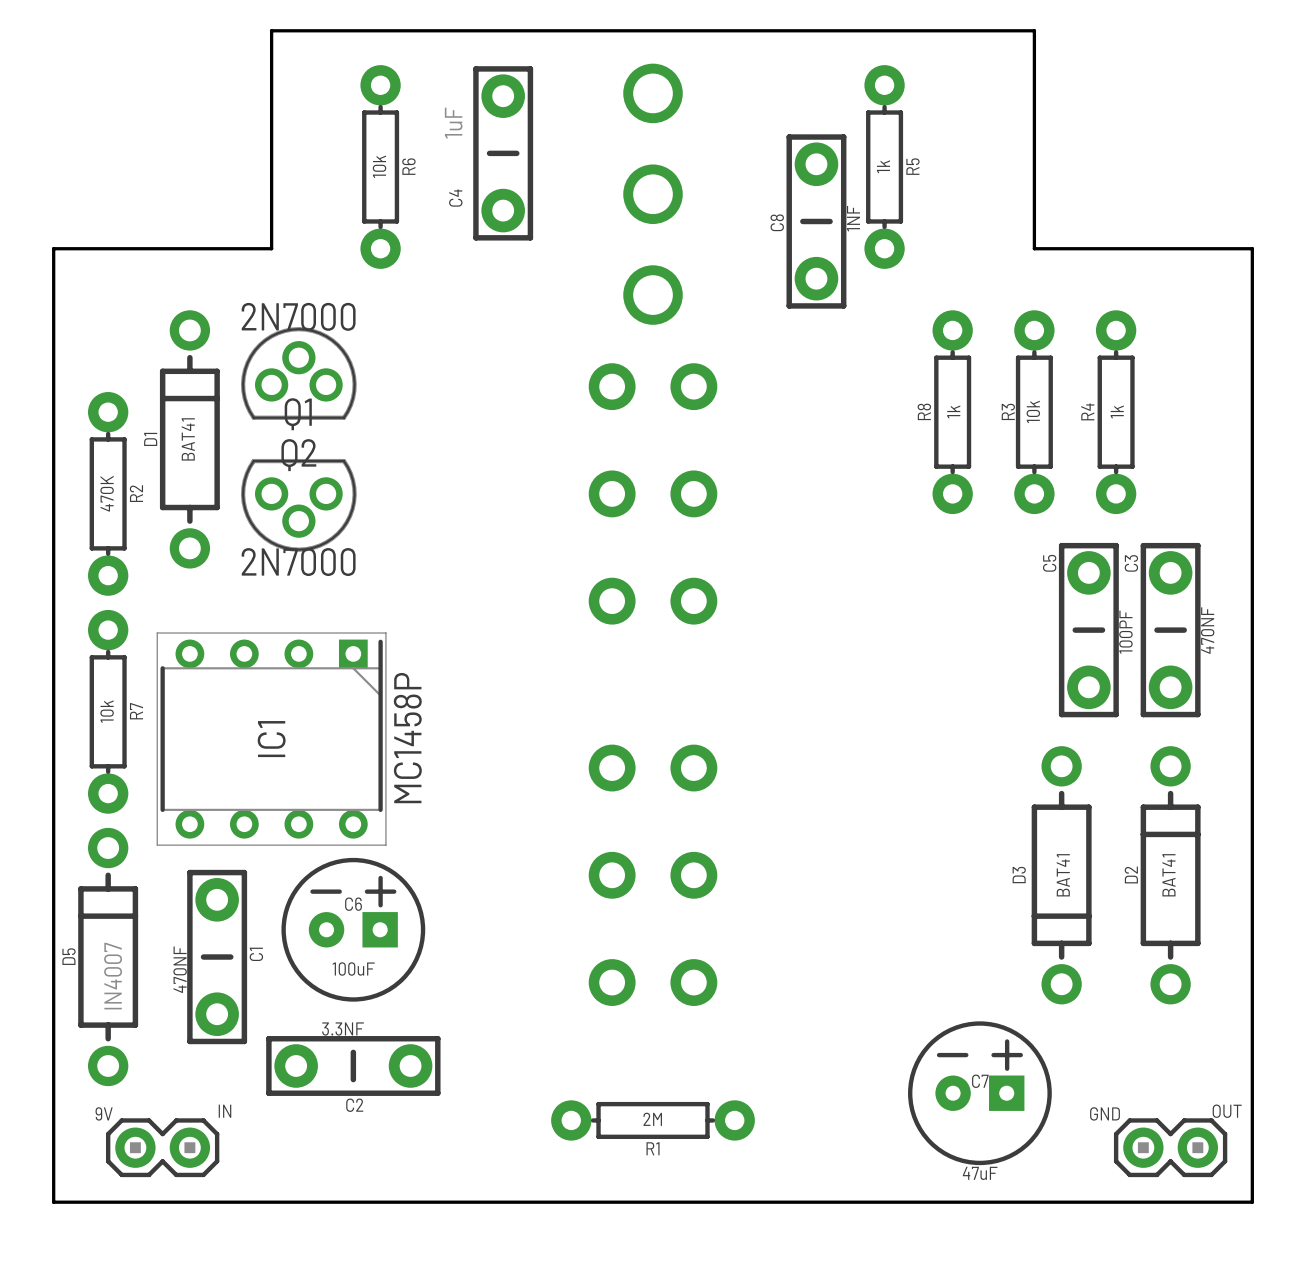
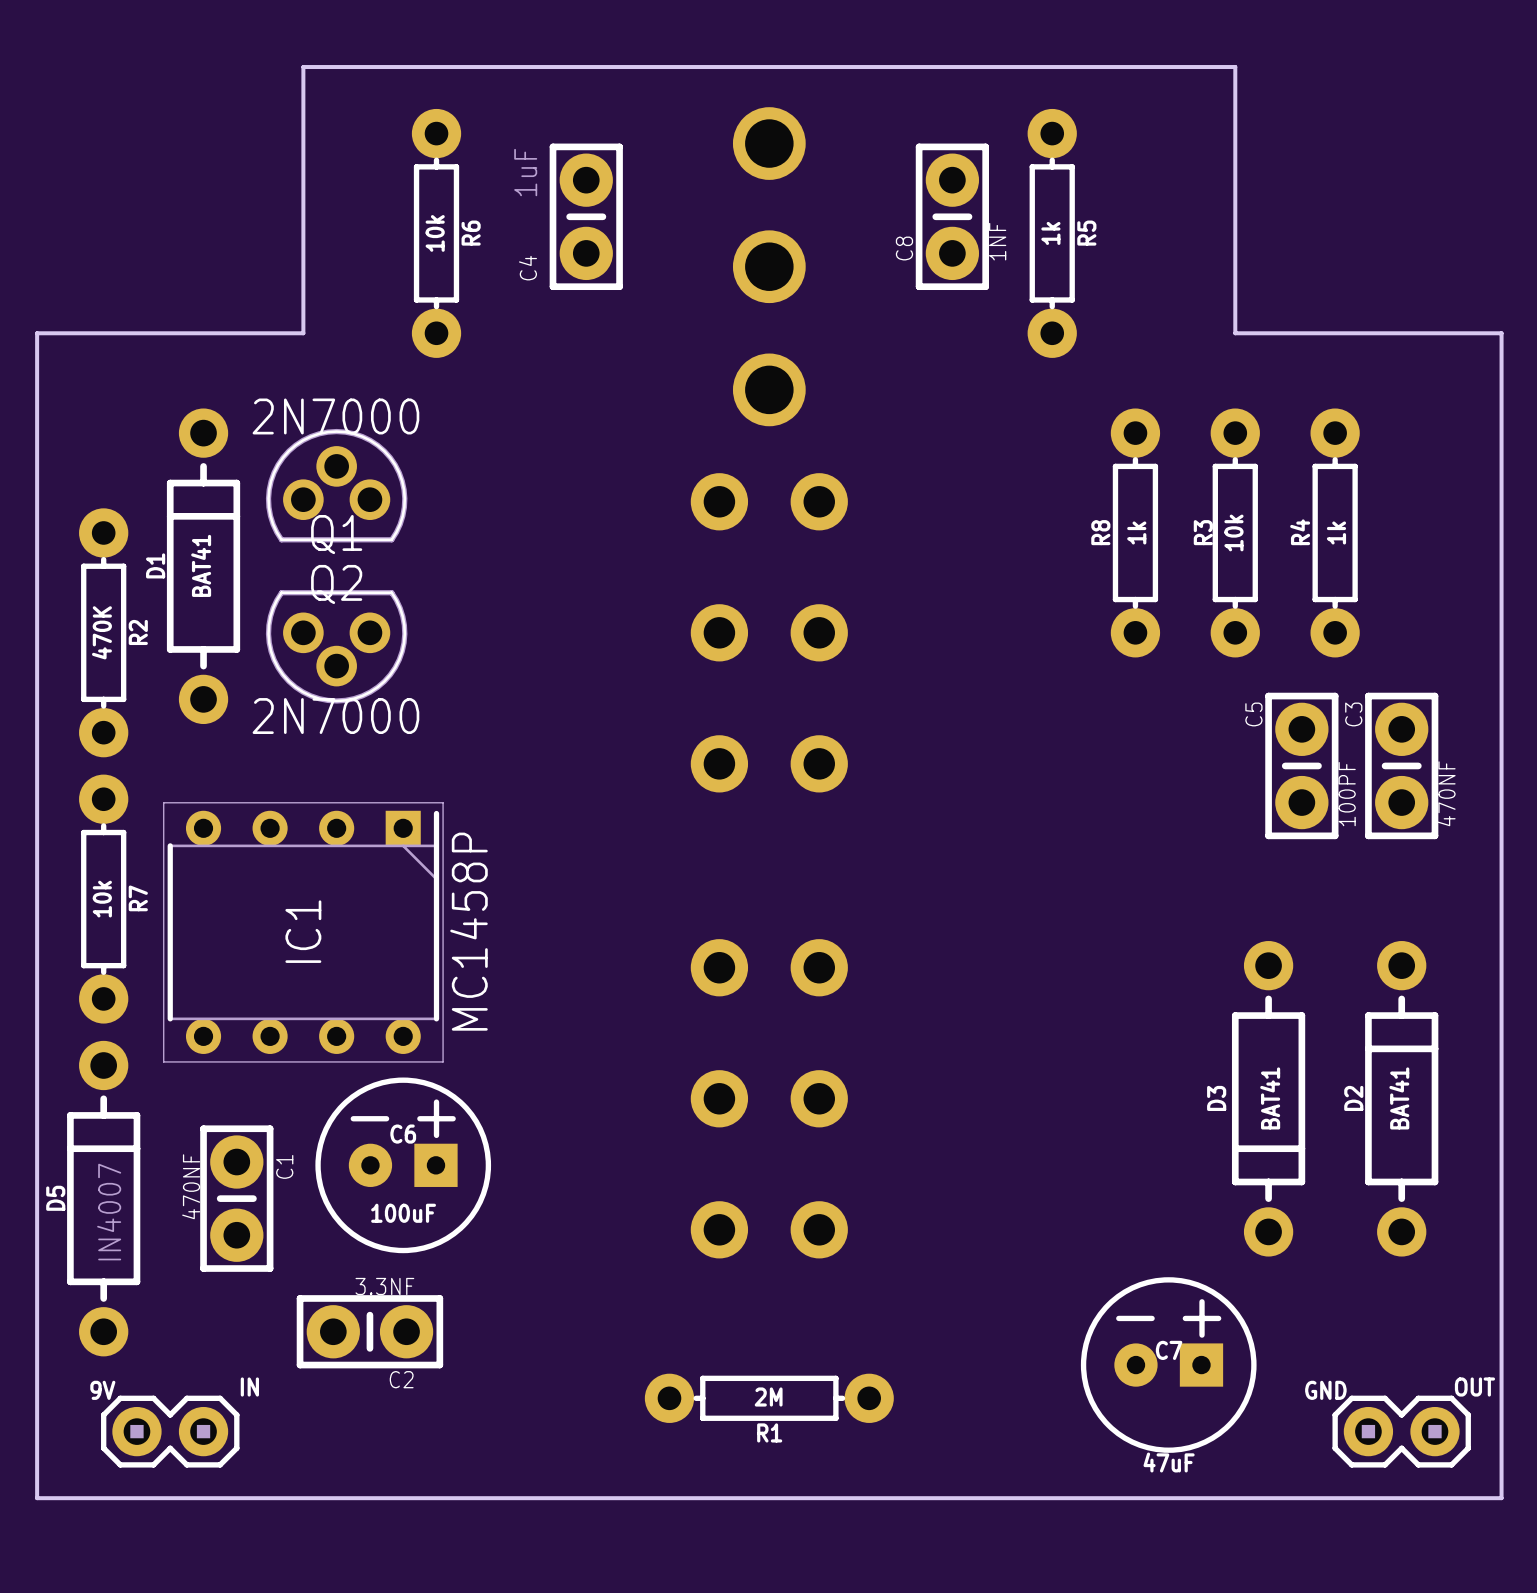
part footprint: [473, 66, 534, 241] -> [549, 143, 623, 291]
C8 footprint: [786, 134, 847, 309] -> [915, 143, 990, 291]
C5 footprint: [1058, 542, 1119, 718] -> [1265, 692, 1339, 840]
C3 footprint: [1140, 542, 1201, 718] -> [1365, 692, 1439, 840]
C1 footprint: [187, 869, 248, 1045] -> [200, 1125, 274, 1272]
C2 footprint: [266, 1036, 441, 1096] -> [296, 1295, 444, 1369]

